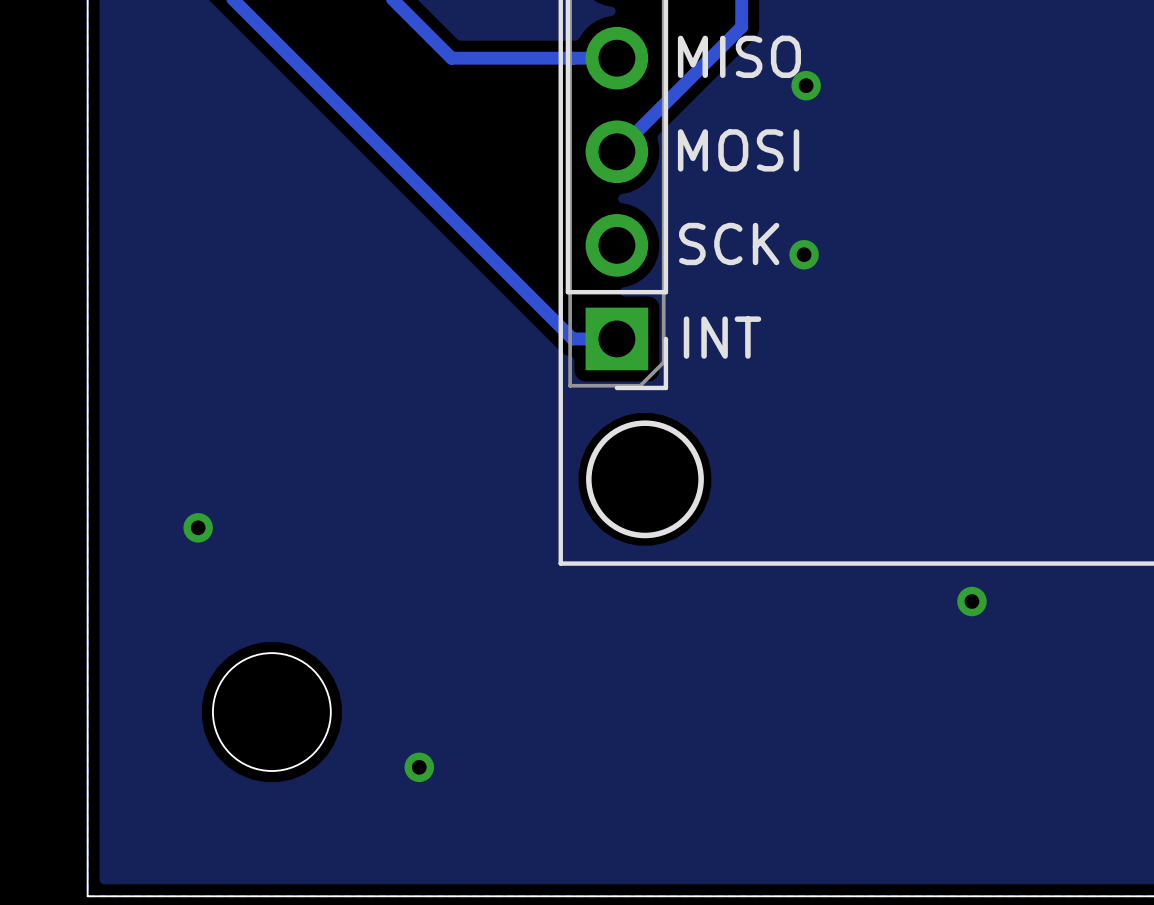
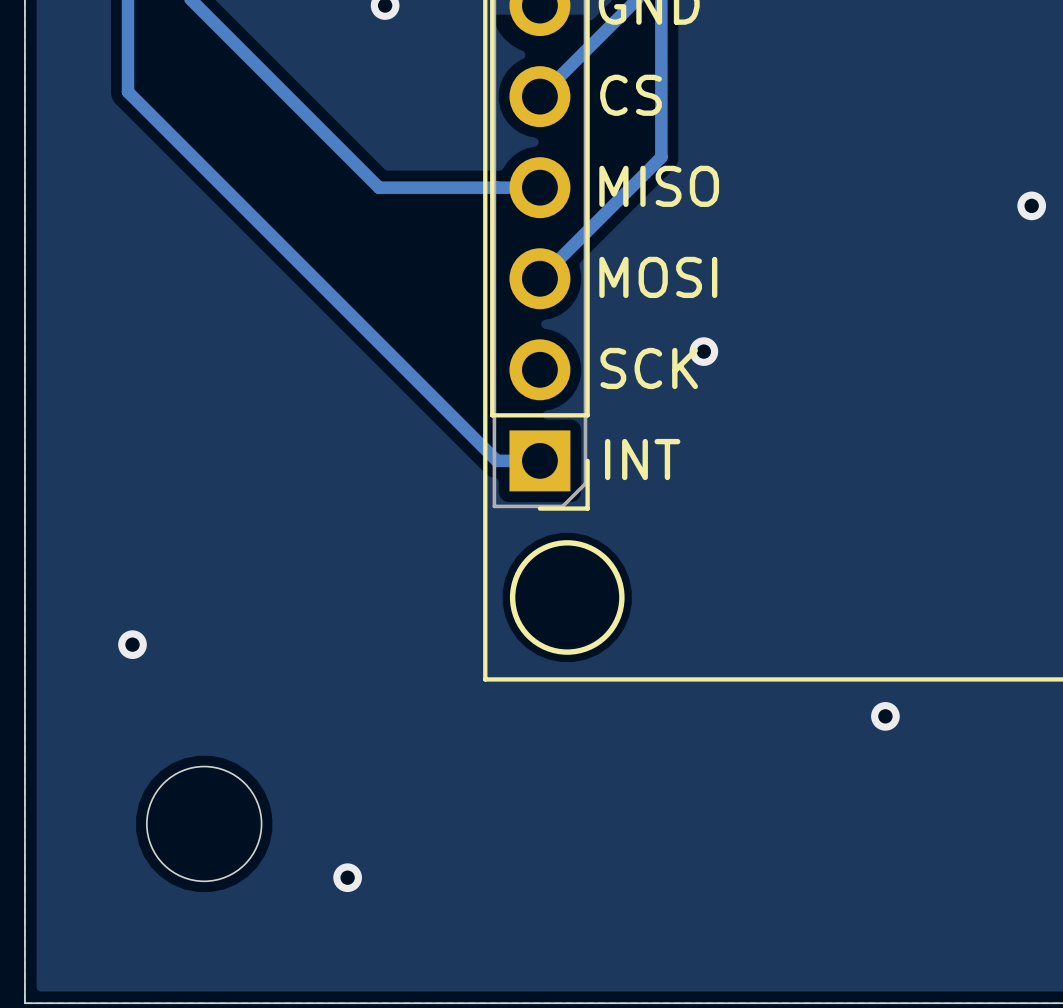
via: none -> (1031, 205)
via: (806, 85) -> none
via position: (804, 254) -> (703, 351)

